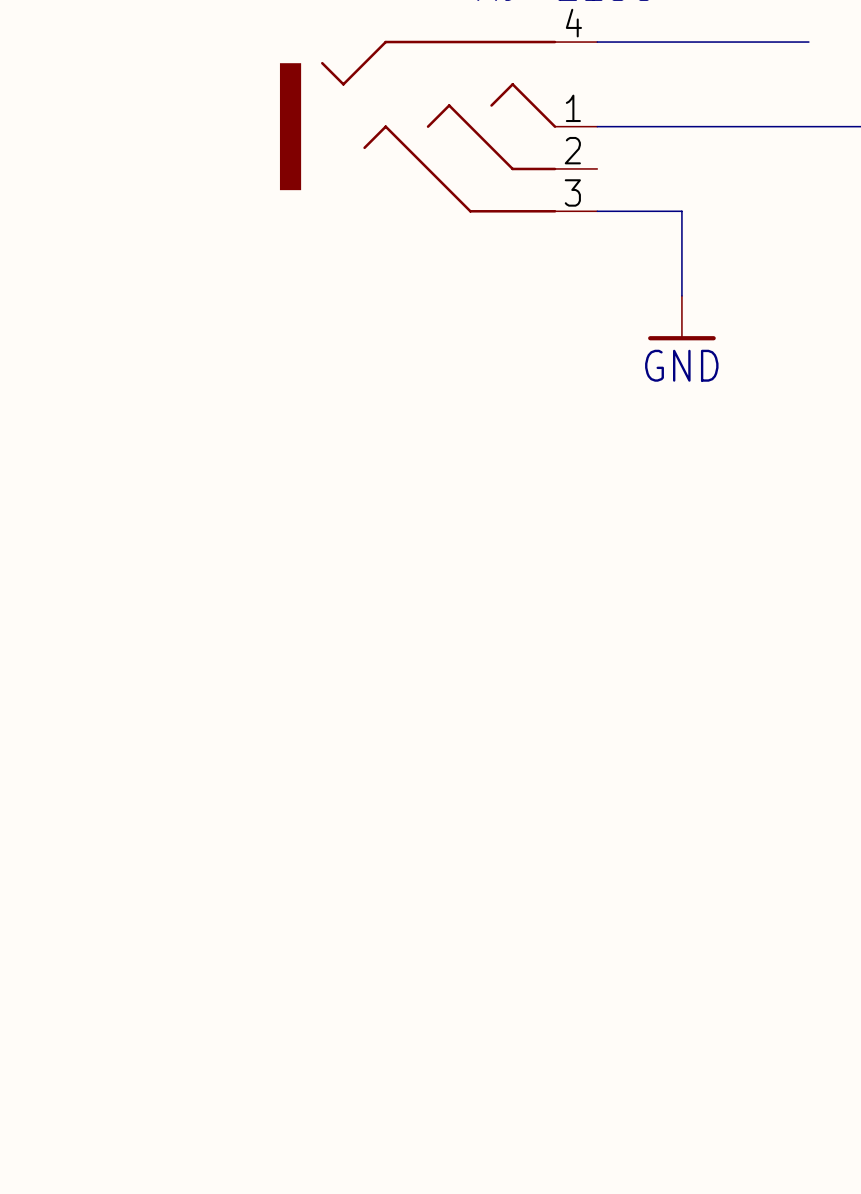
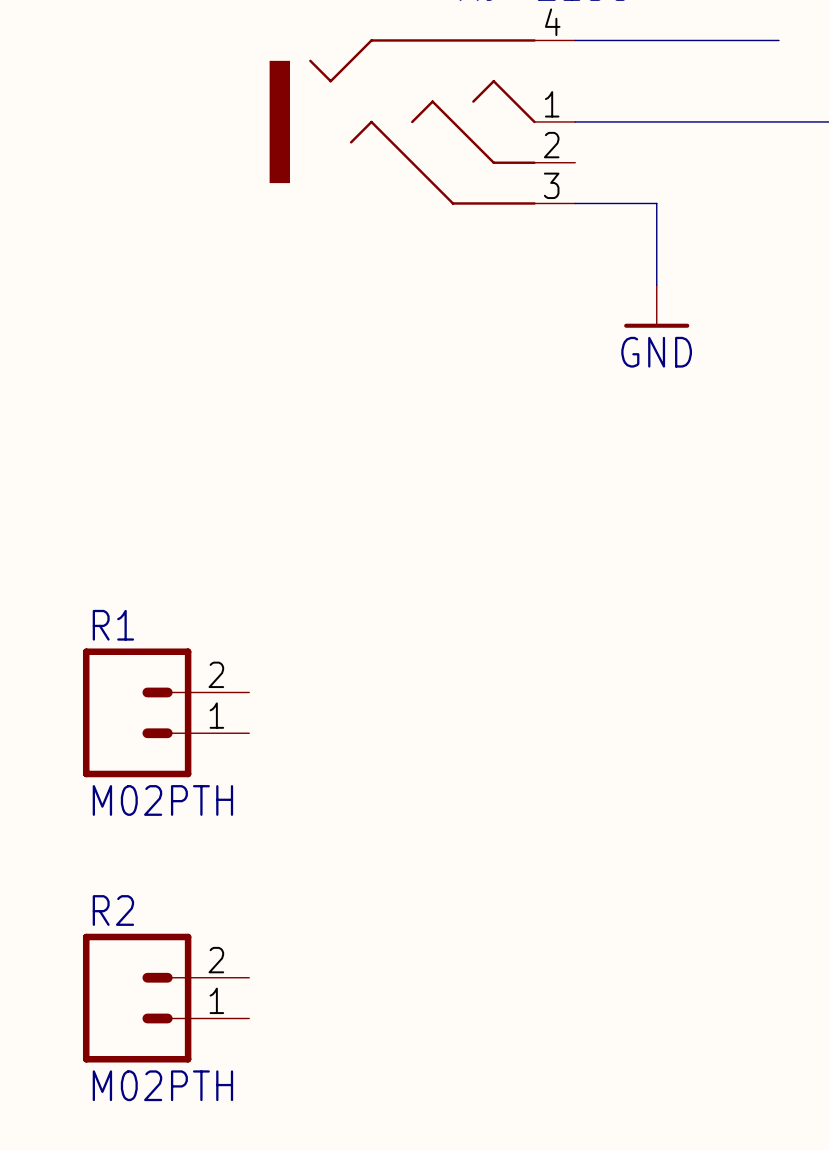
R1: none -> M02PTH (166, 712)
R2: none -> M02PTH (166, 998)

